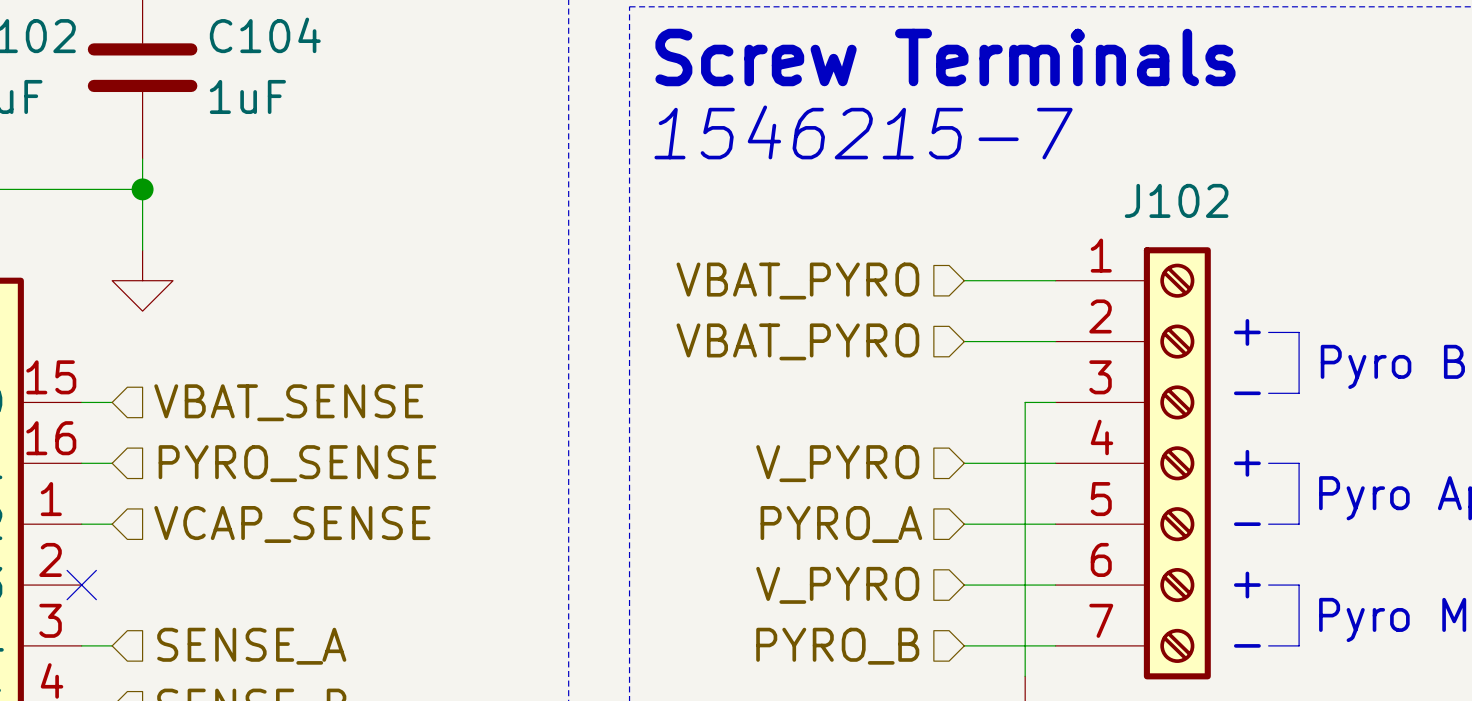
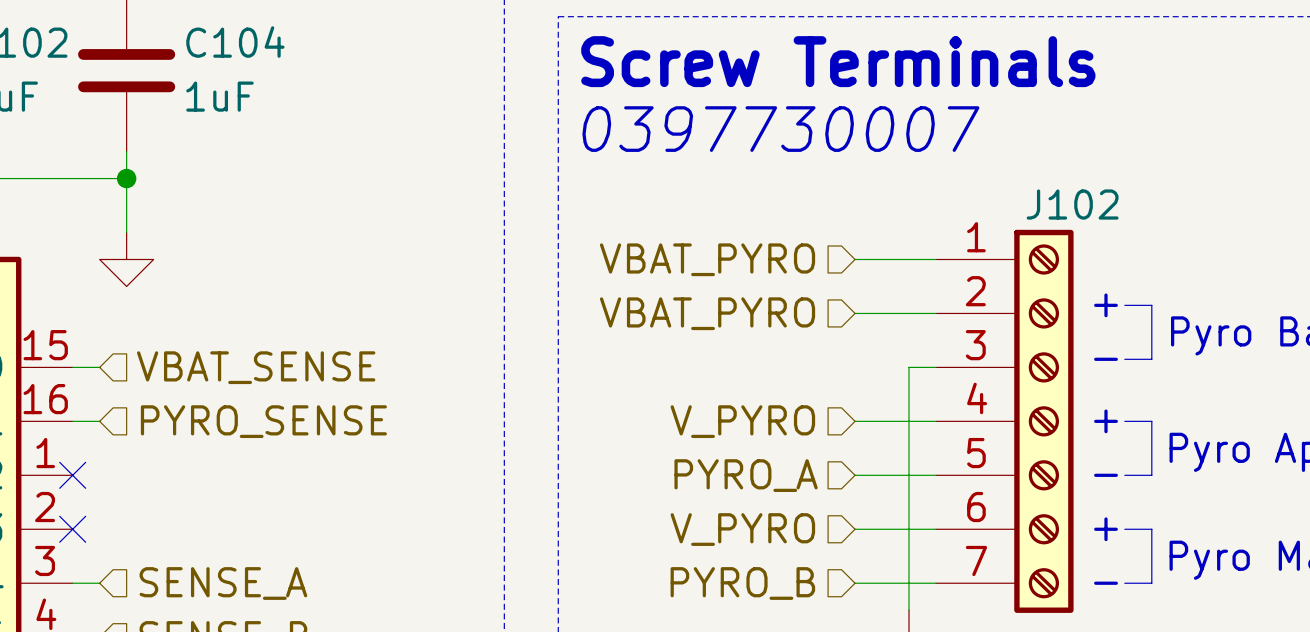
text: 1546215-7 (863, 132) -> 0397730007 (780, 129)
J102 name position: J102 (1176, 200) -> J102 (1072, 204)
wire: (81, 524) (112, 524) -> none
no-connect mark: none -> (72, 475)
hierarchical label: VCAP_SENSE (292, 524) -> none

